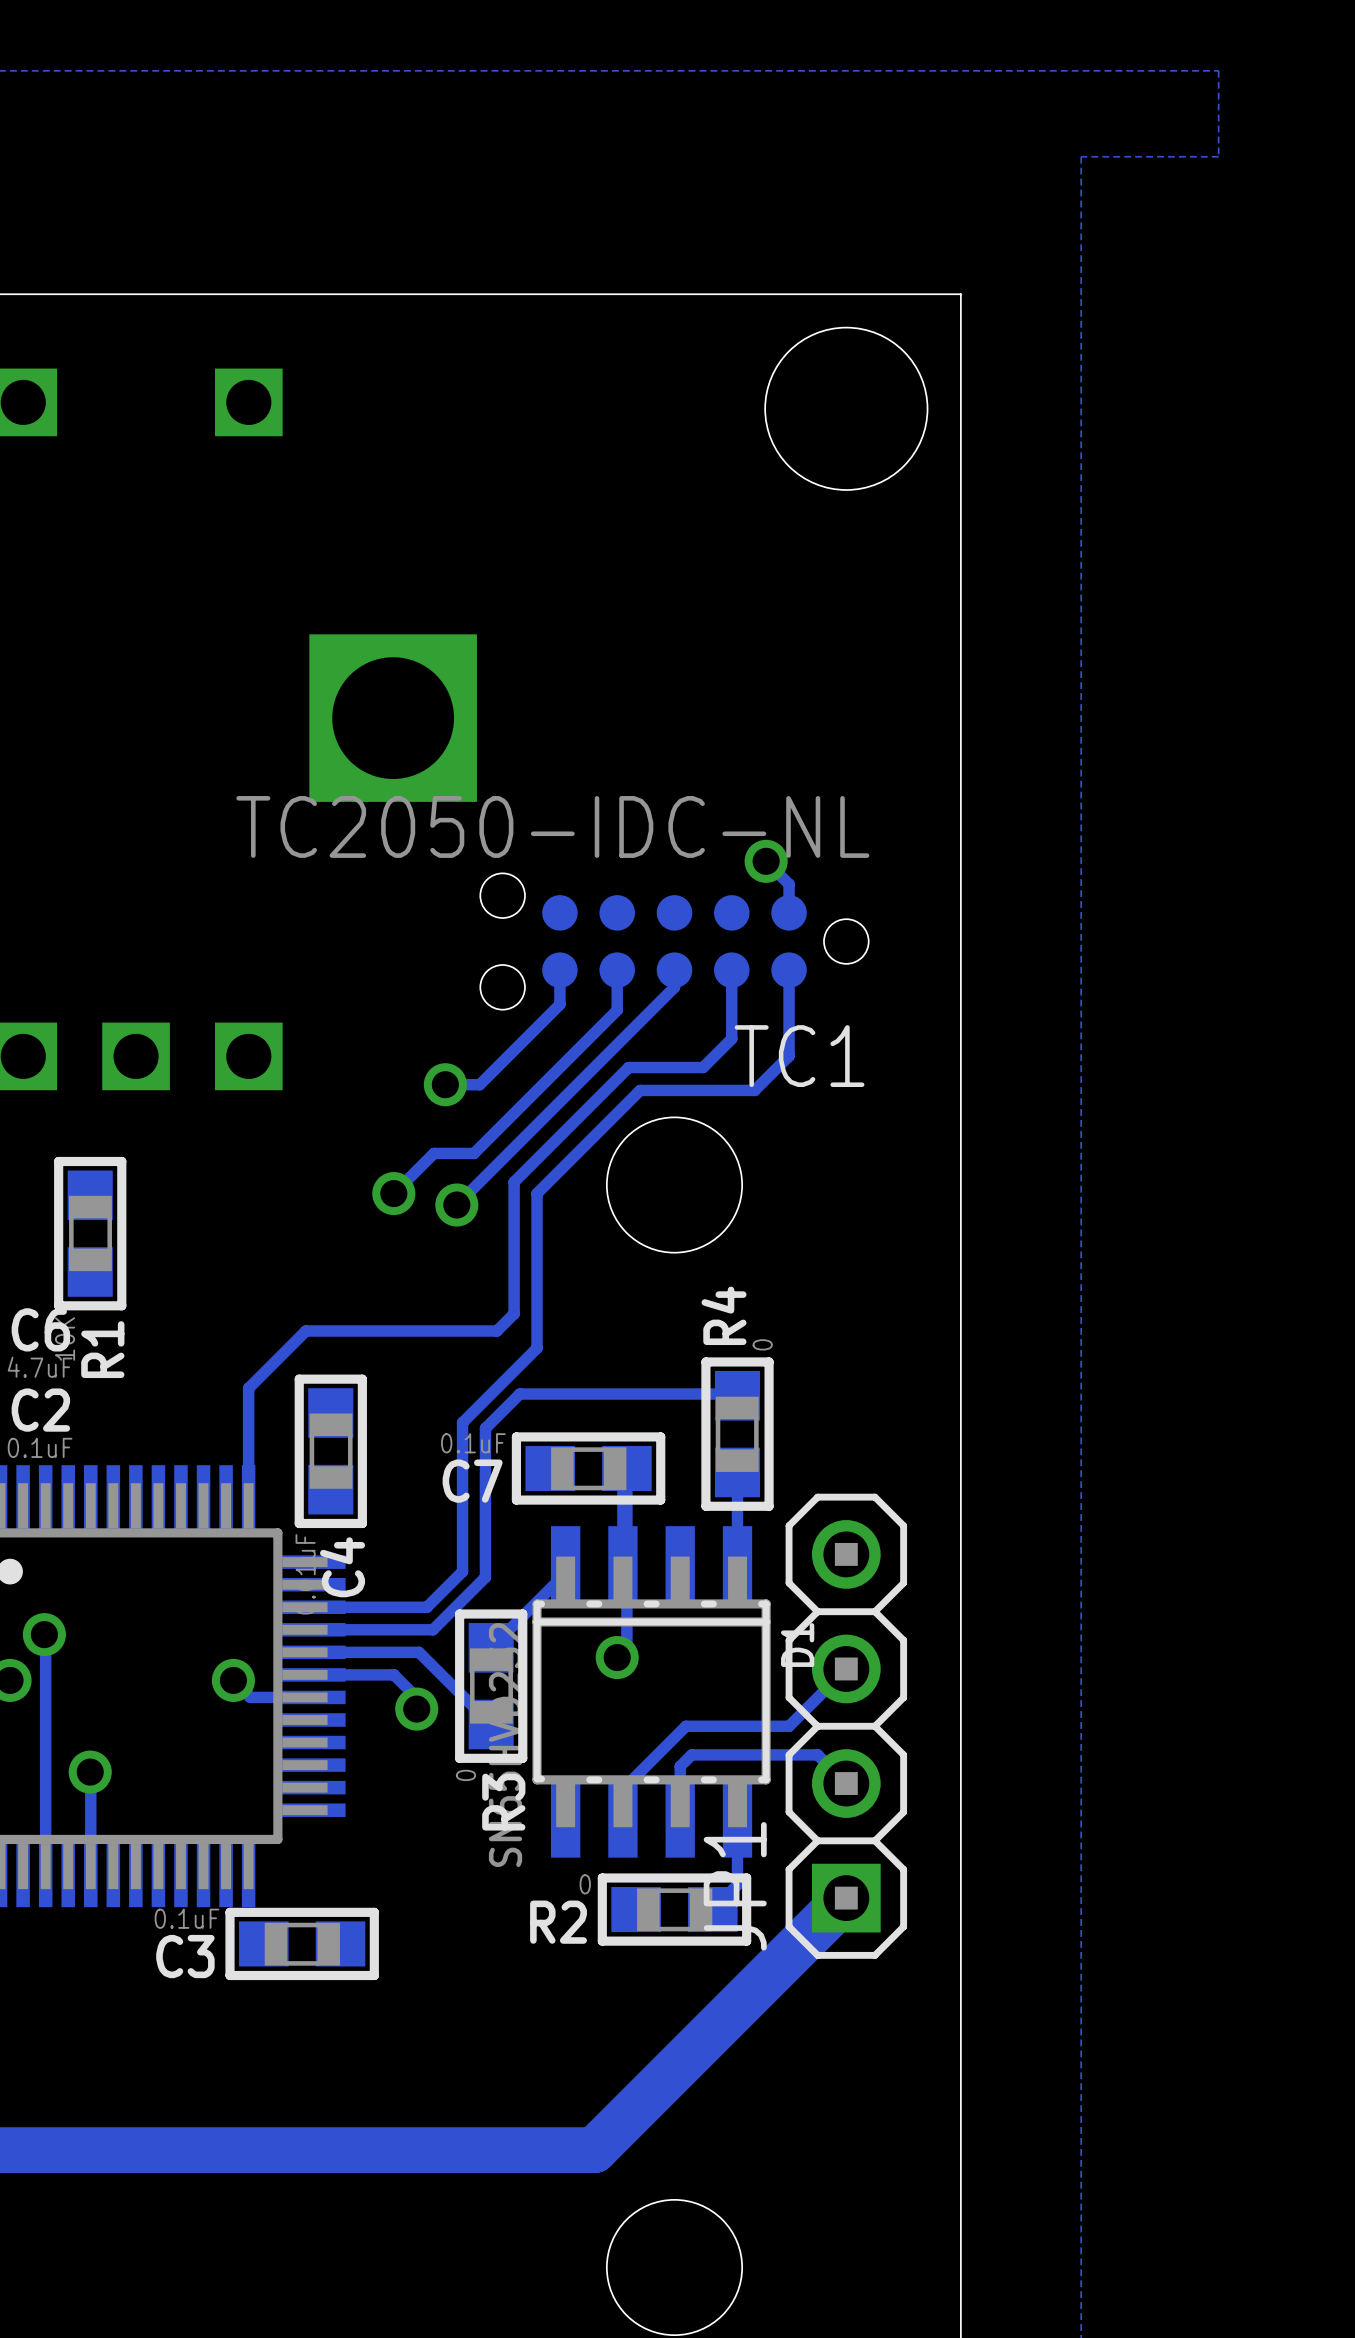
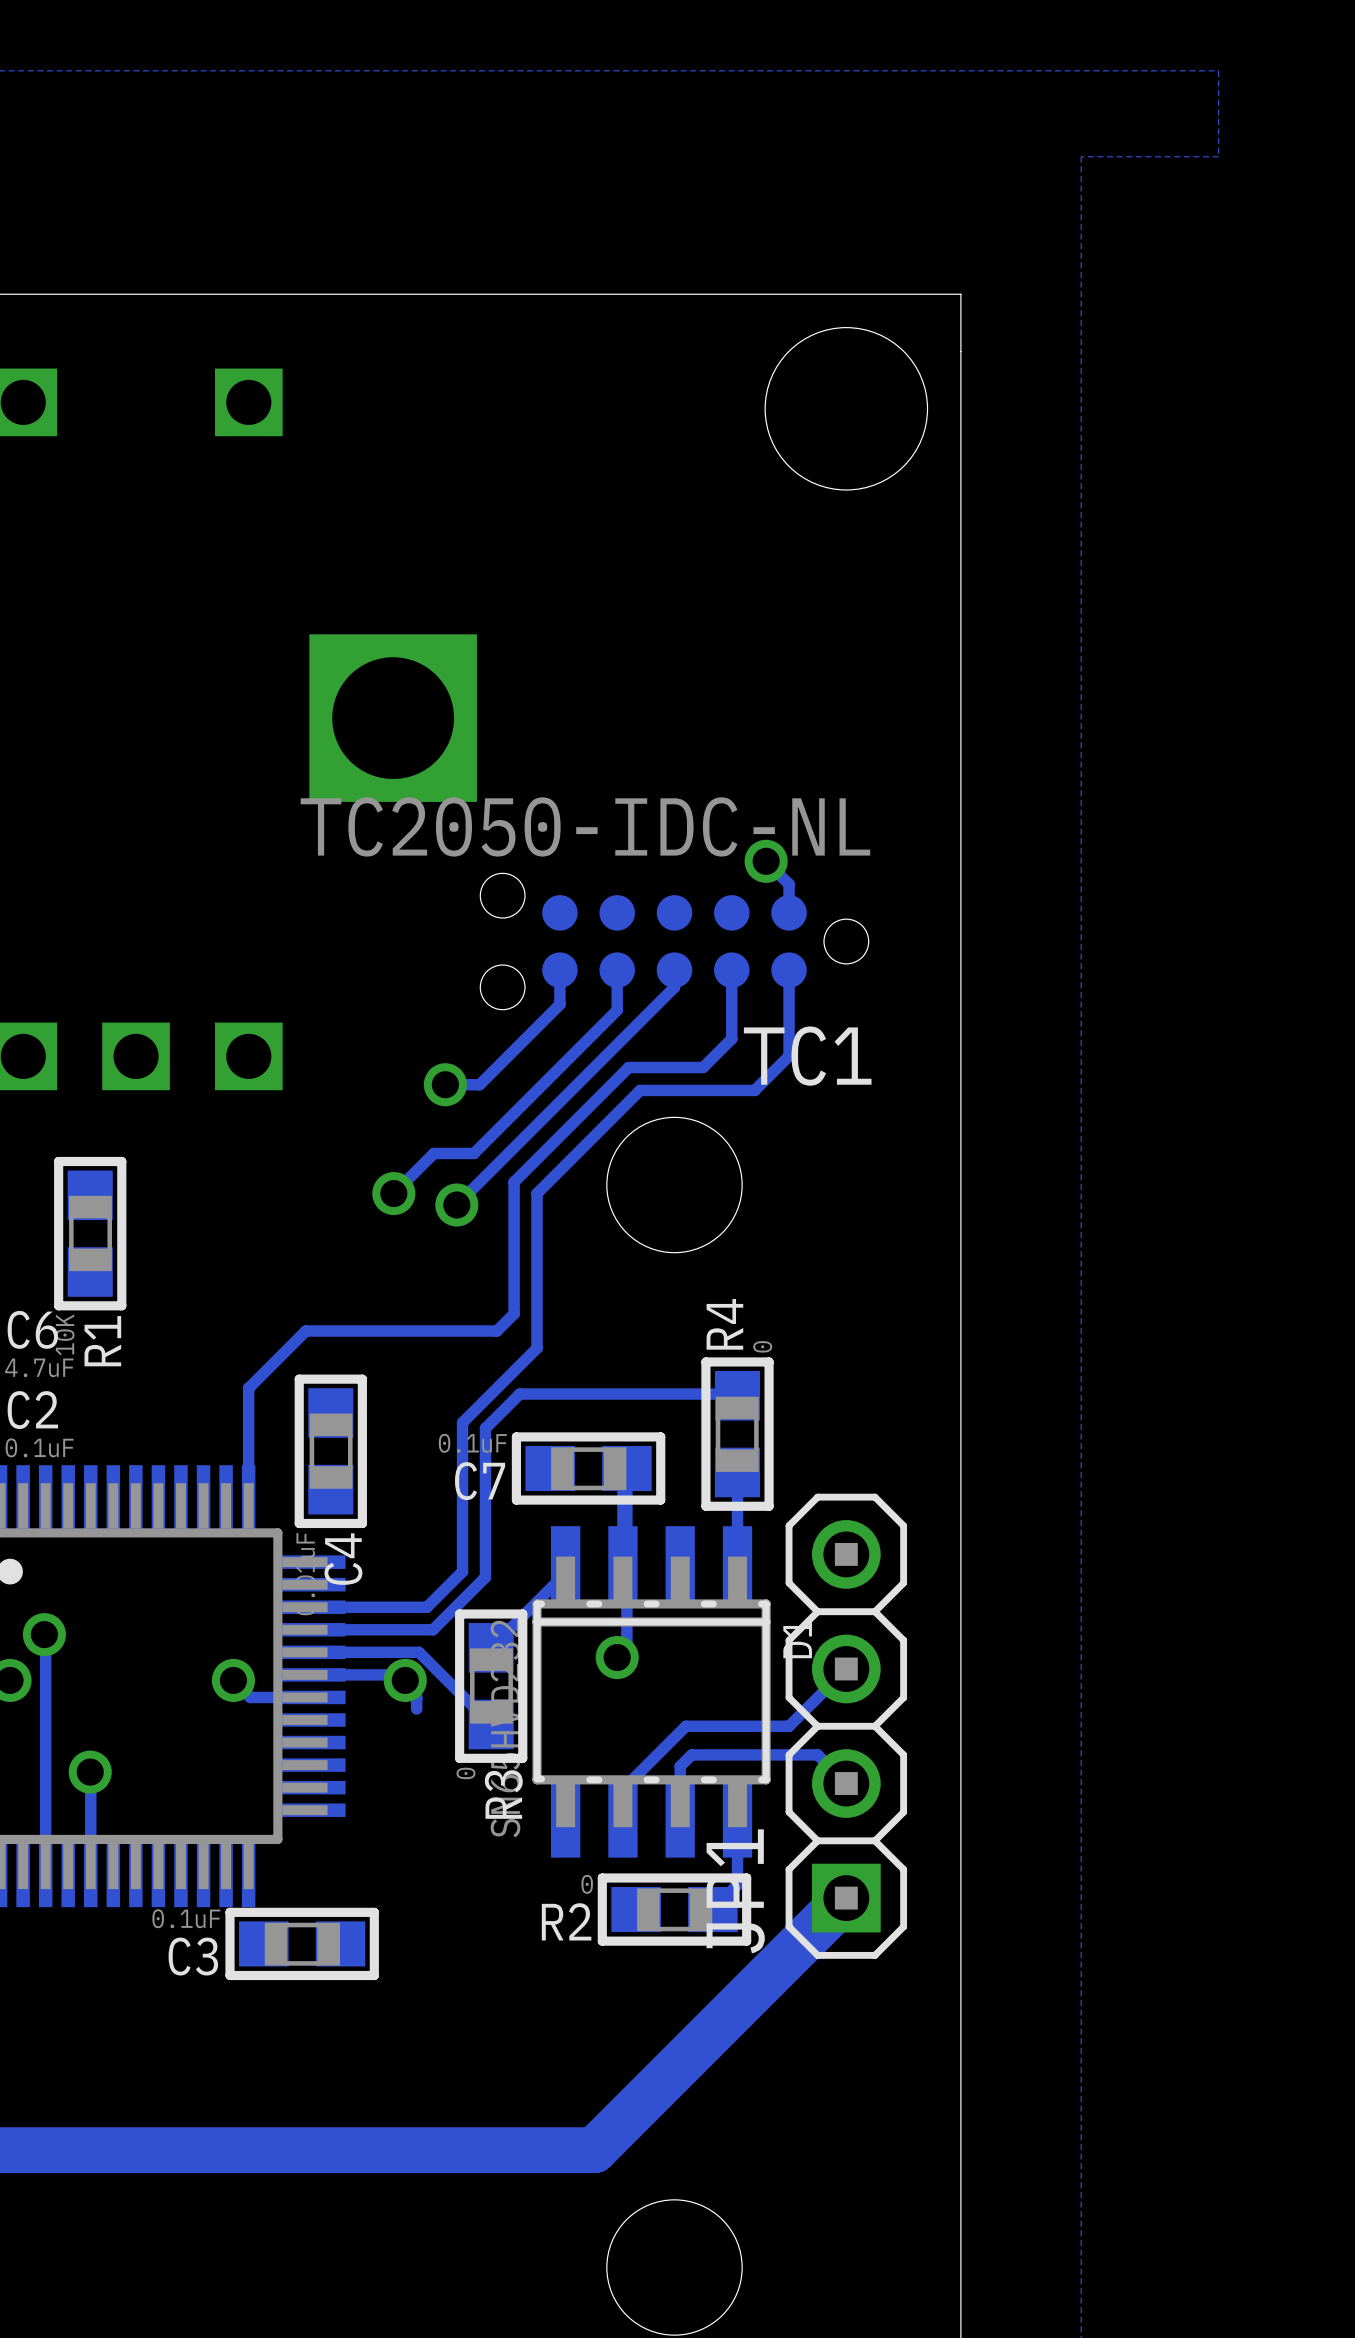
via position: (416, 1709) -> (405, 1680)

